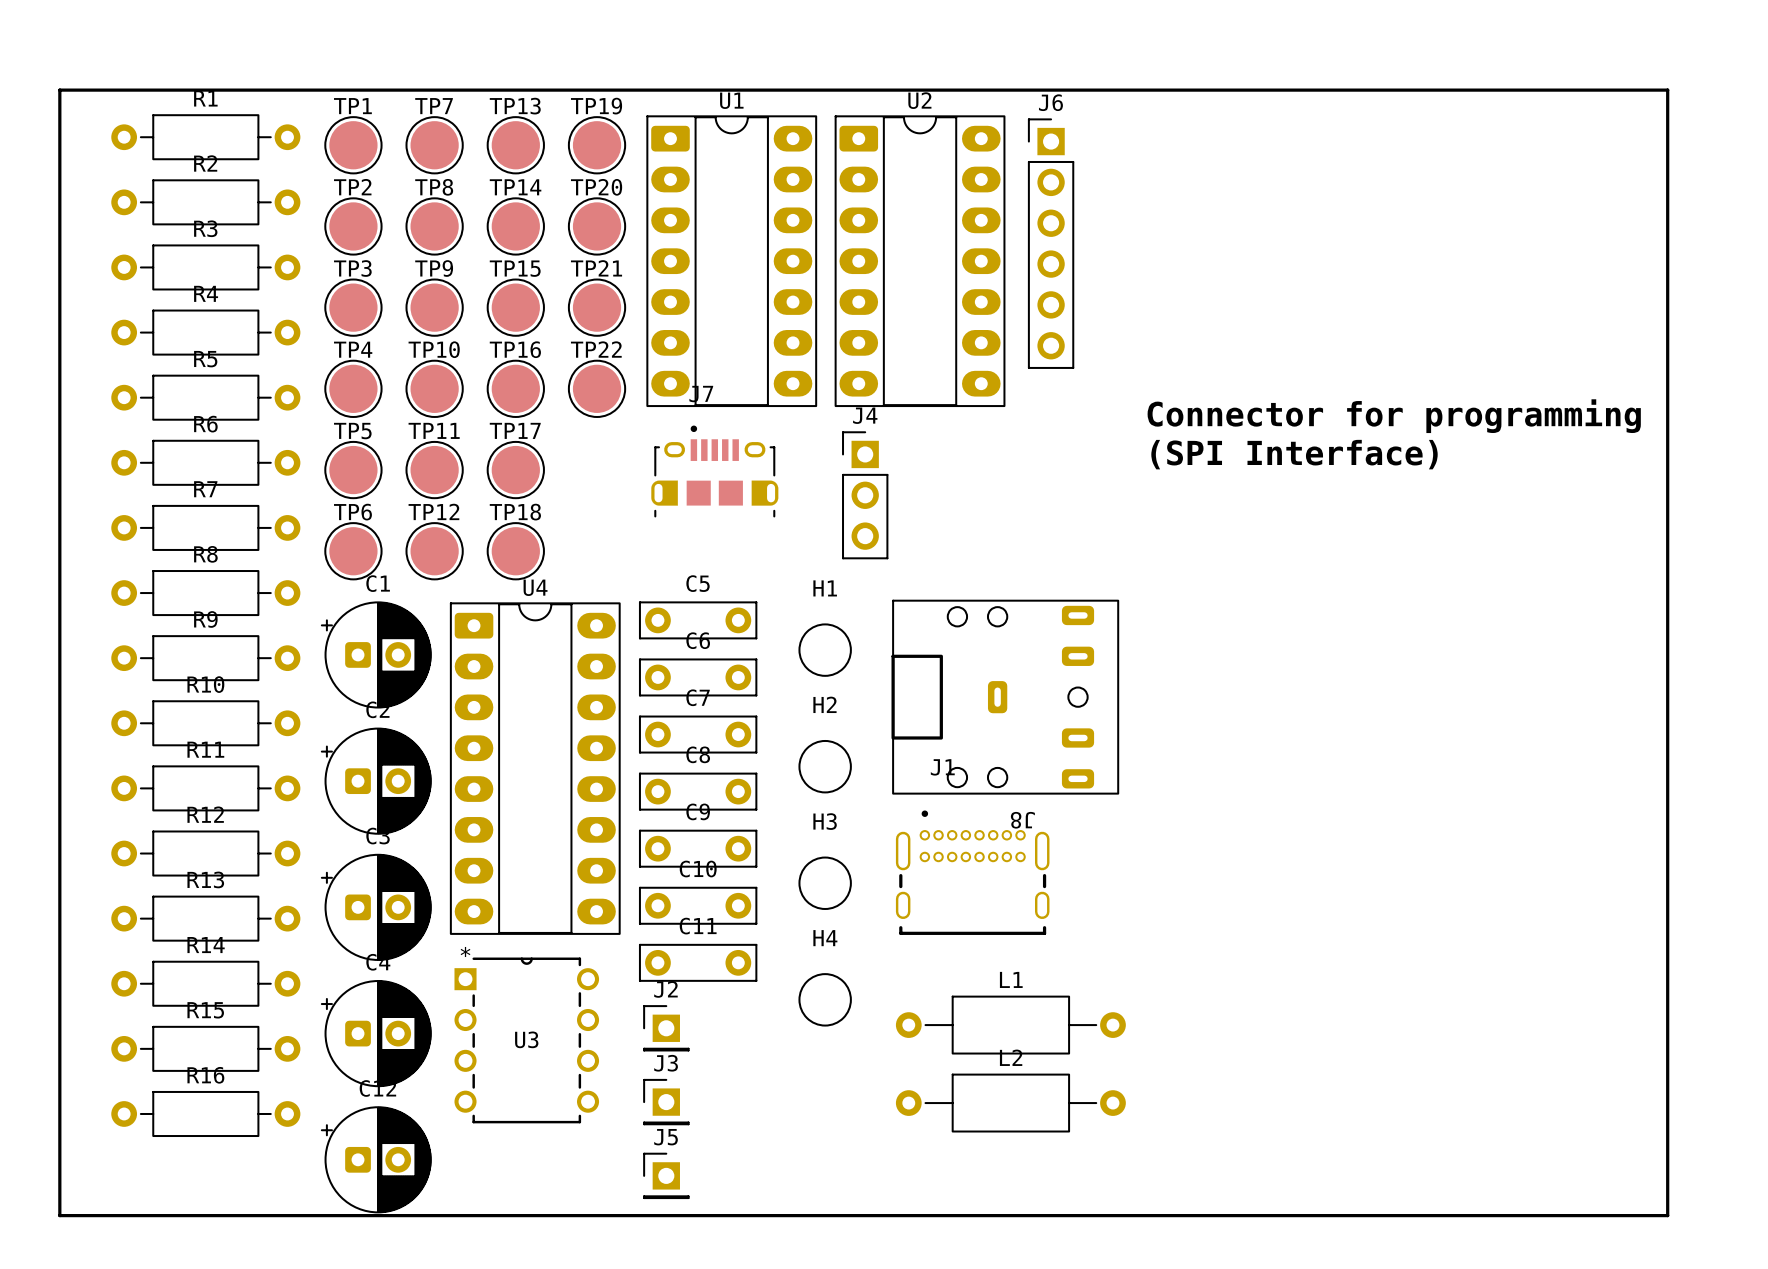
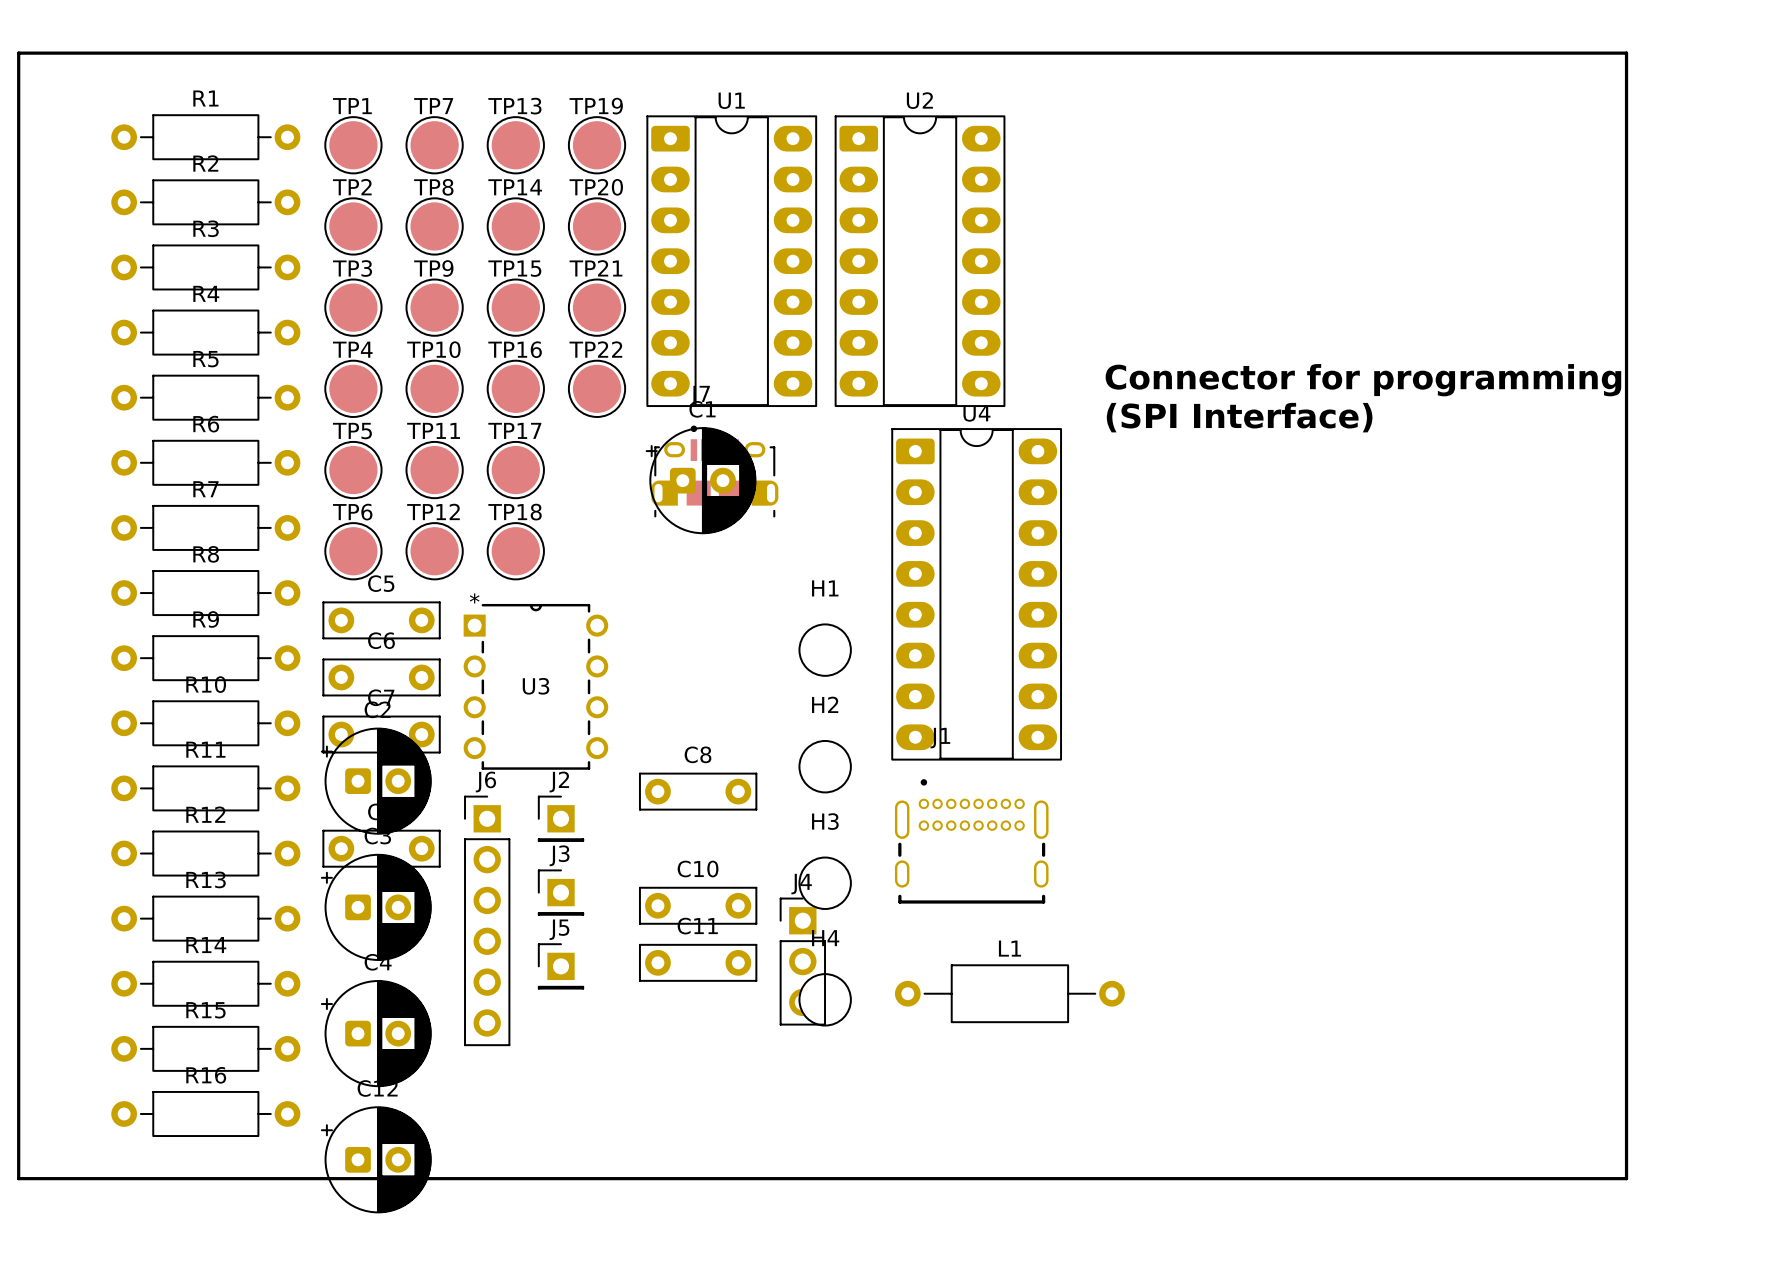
board edge: (59, 90) (1667, 90) (1667, 1215) (59, 1215) (59, 90) -> (18, 53) (1626, 53) (1626, 1178) (18, 1178) (18, 53)
J6 position: (1051, 243) -> (487, 920)
text position: Connector for programming (1394, 416) -> Connector for programming (1363, 380)
text position: (SPI Interface) (1294, 454) -> (SPI Interface) (1239, 417)
J4 position: (865, 495) -> (802, 961)
C5 position: (698, 620) -> (381, 620)
C1 position: (376, 654) -> (701, 480)
C6 position: (698, 677) -> (381, 677)
J8: (1005, 697) -> none
C7 position: (698, 734) -> (381, 734)
U4 position: (535, 768) -> (976, 594)
C9 position: (698, 848) -> (381, 848)
J1 position: (972, 872) -> (971, 841)
L1 position: (1010, 1025) -> (1009, 993)
J2 position: (666, 1028) -> (561, 818)
U3 position: (526, 1040) -> (535, 686)
J3 position: (666, 1102) -> (561, 892)
L2: (1010, 1103) -> none
J5 position: (666, 1175) -> (561, 966)

